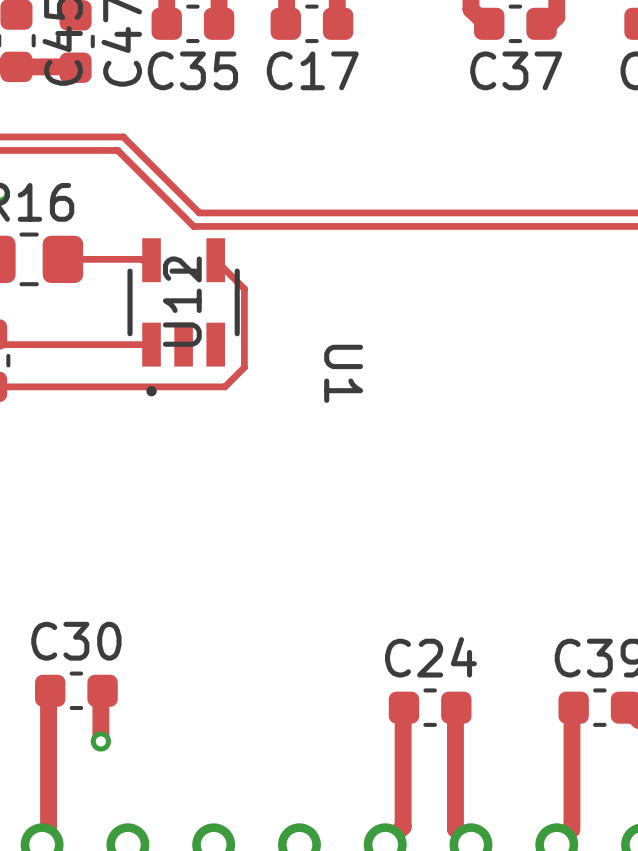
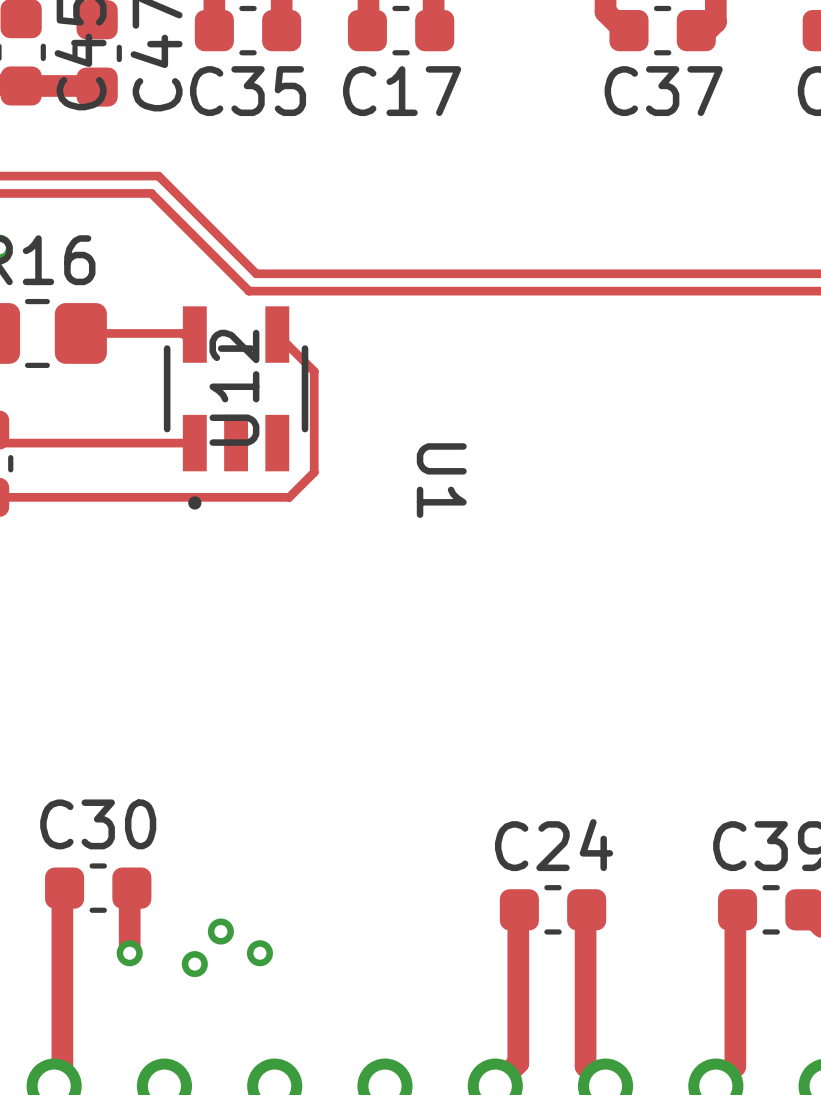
via: none -> (220, 931)
via: none -> (259, 953)
via: none -> (194, 964)

